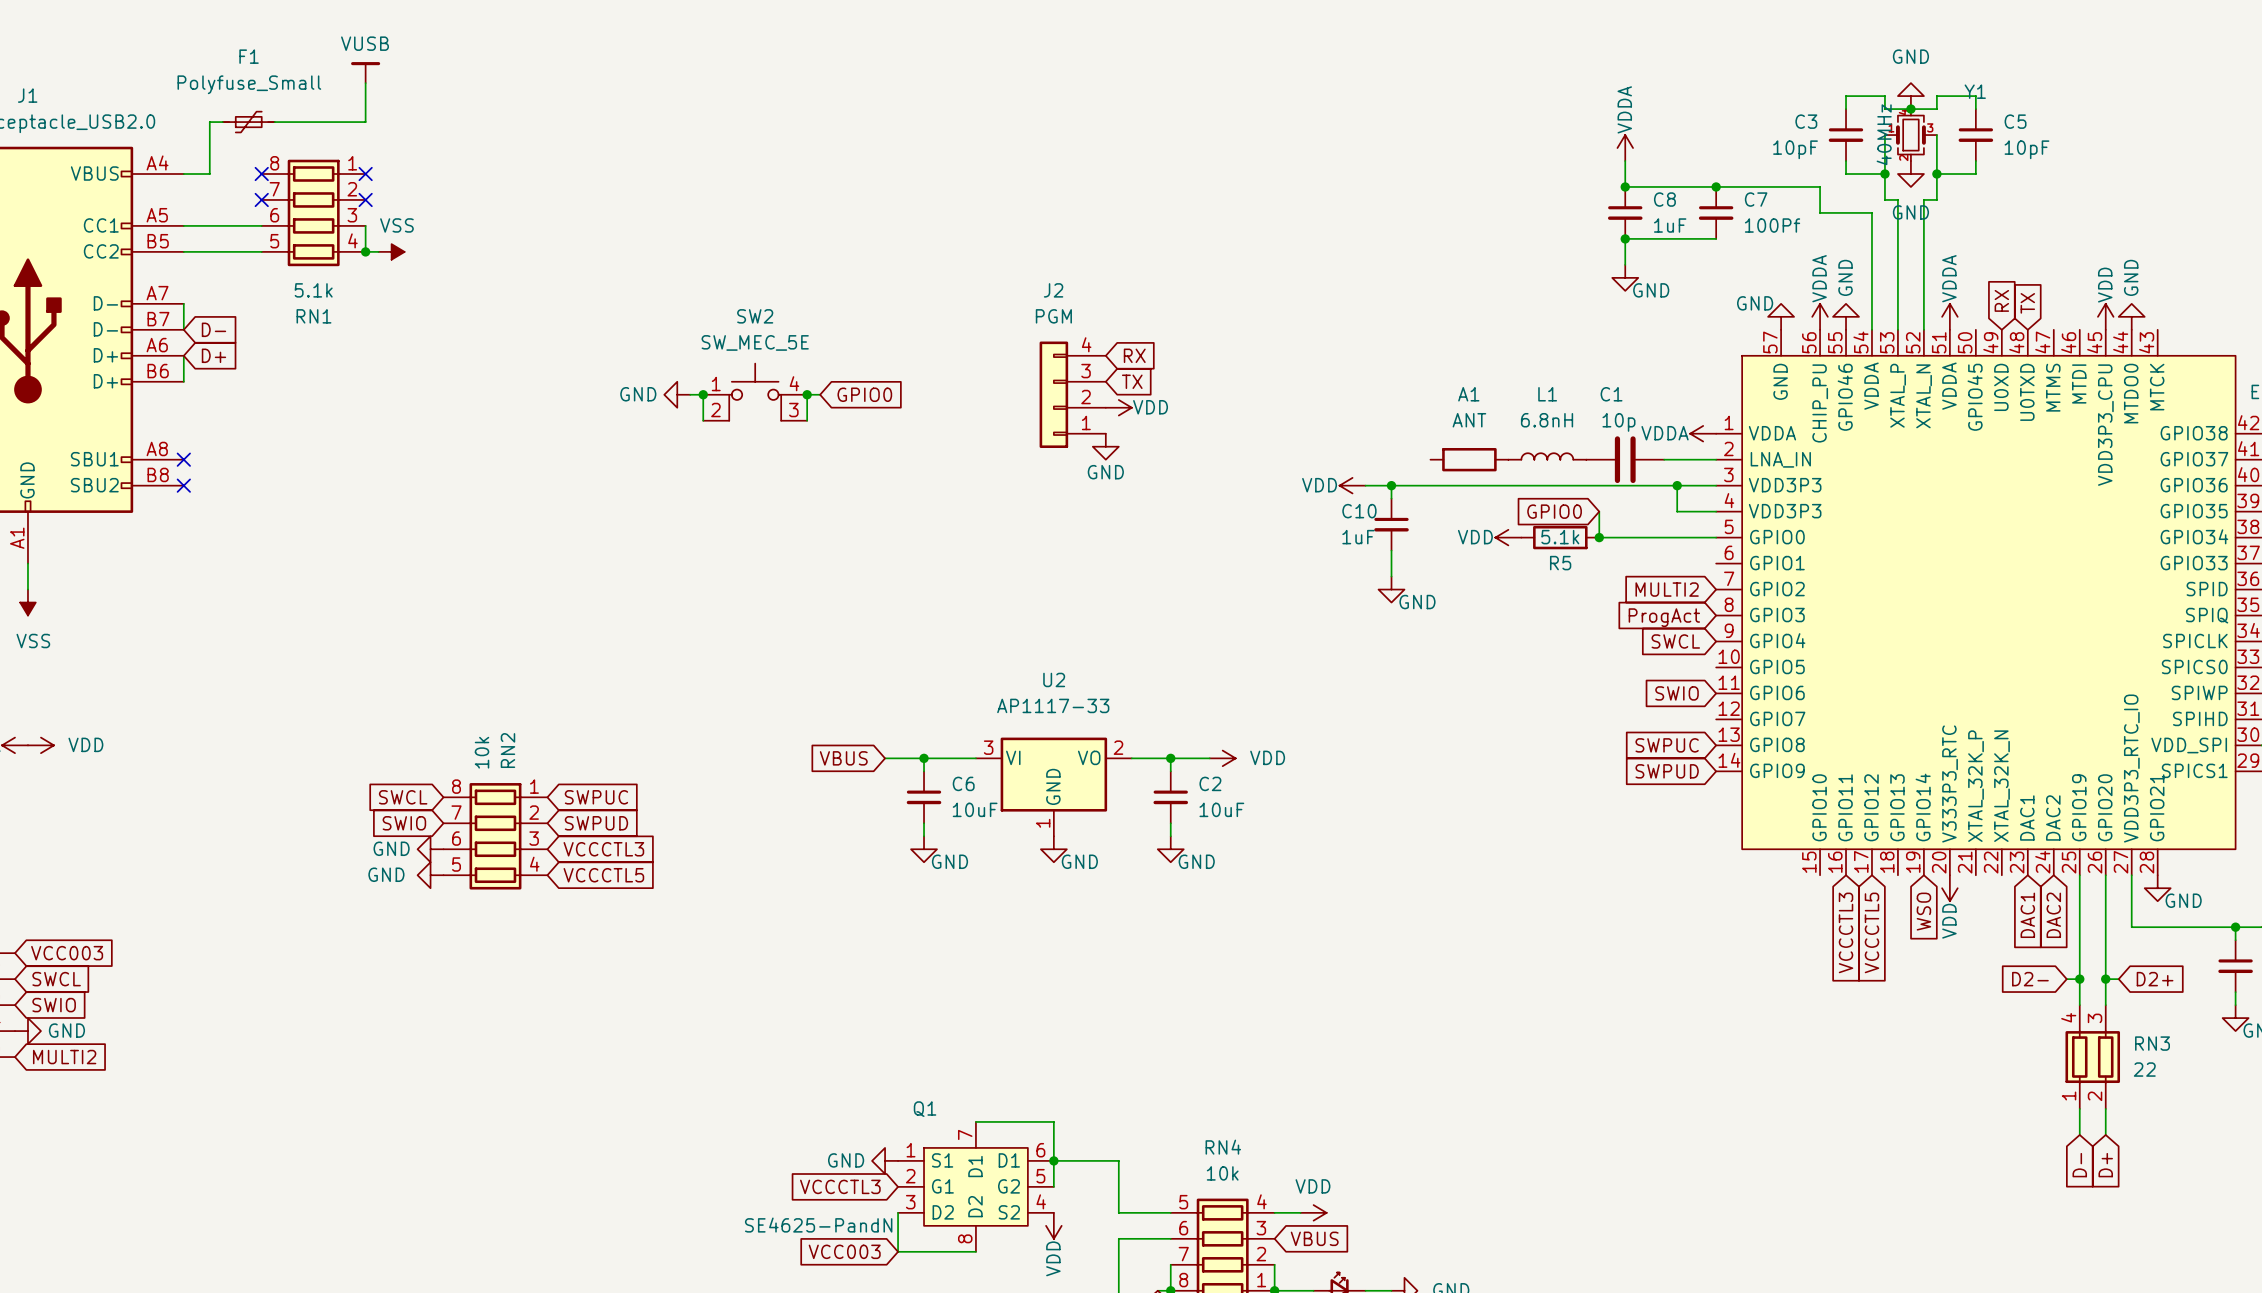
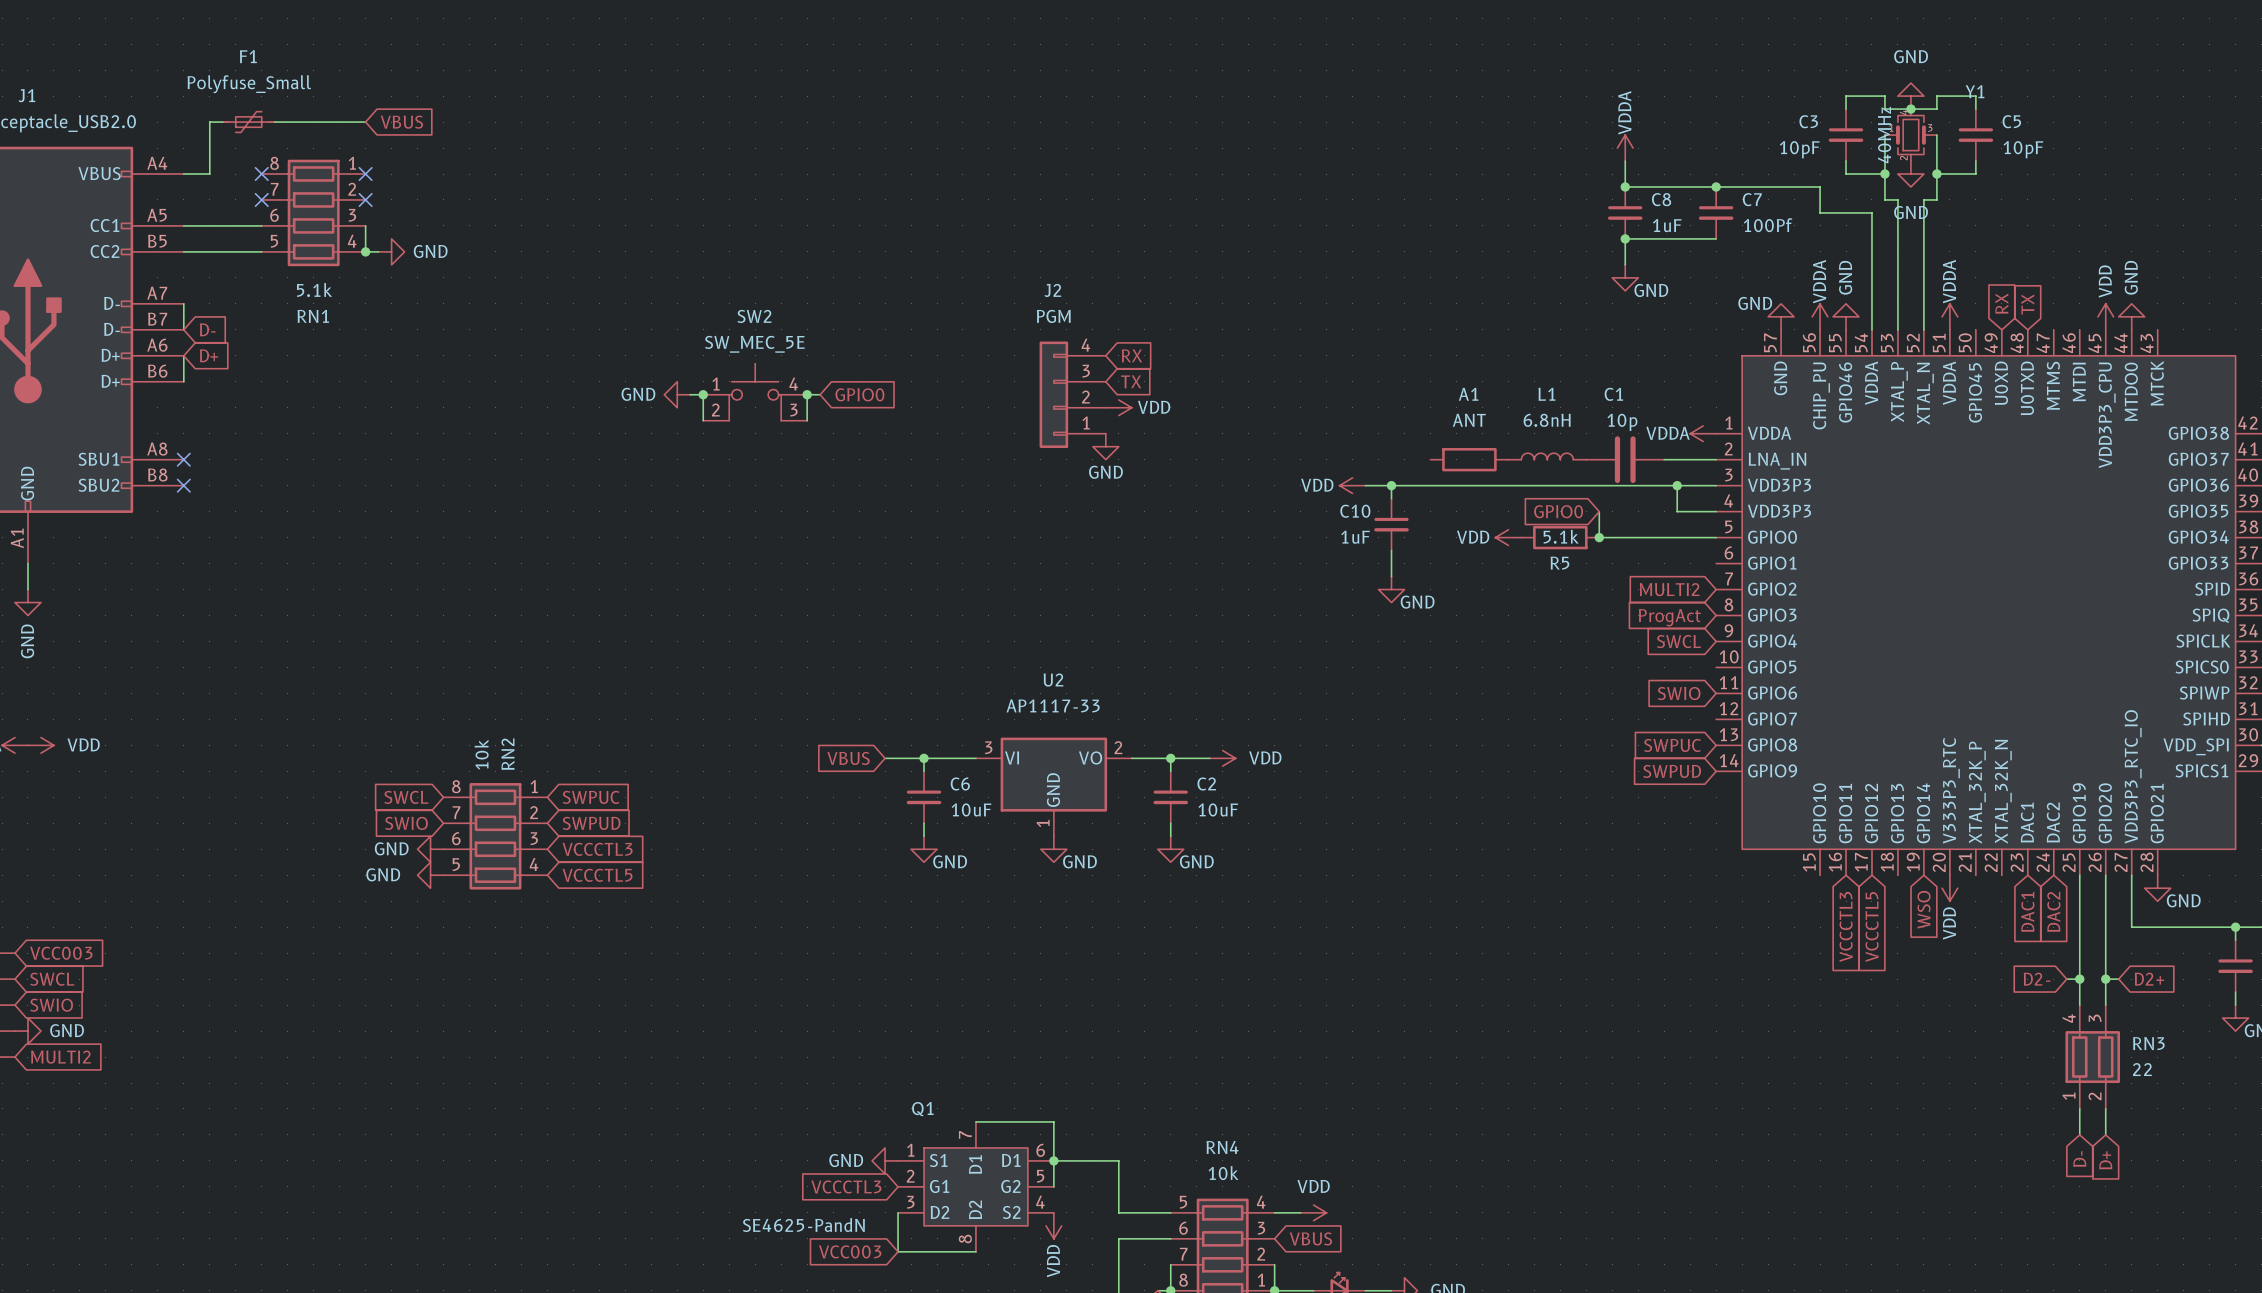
power symbol: VUSB (365, 72) -> none
wire: (365, 83) (365, 122) -> none
global label: none -> VBUS (401, 122)
power symbol: VSS (391, 251) -> GND (391, 251)
power symbol: VSS (27, 602) -> GND (27, 602)

